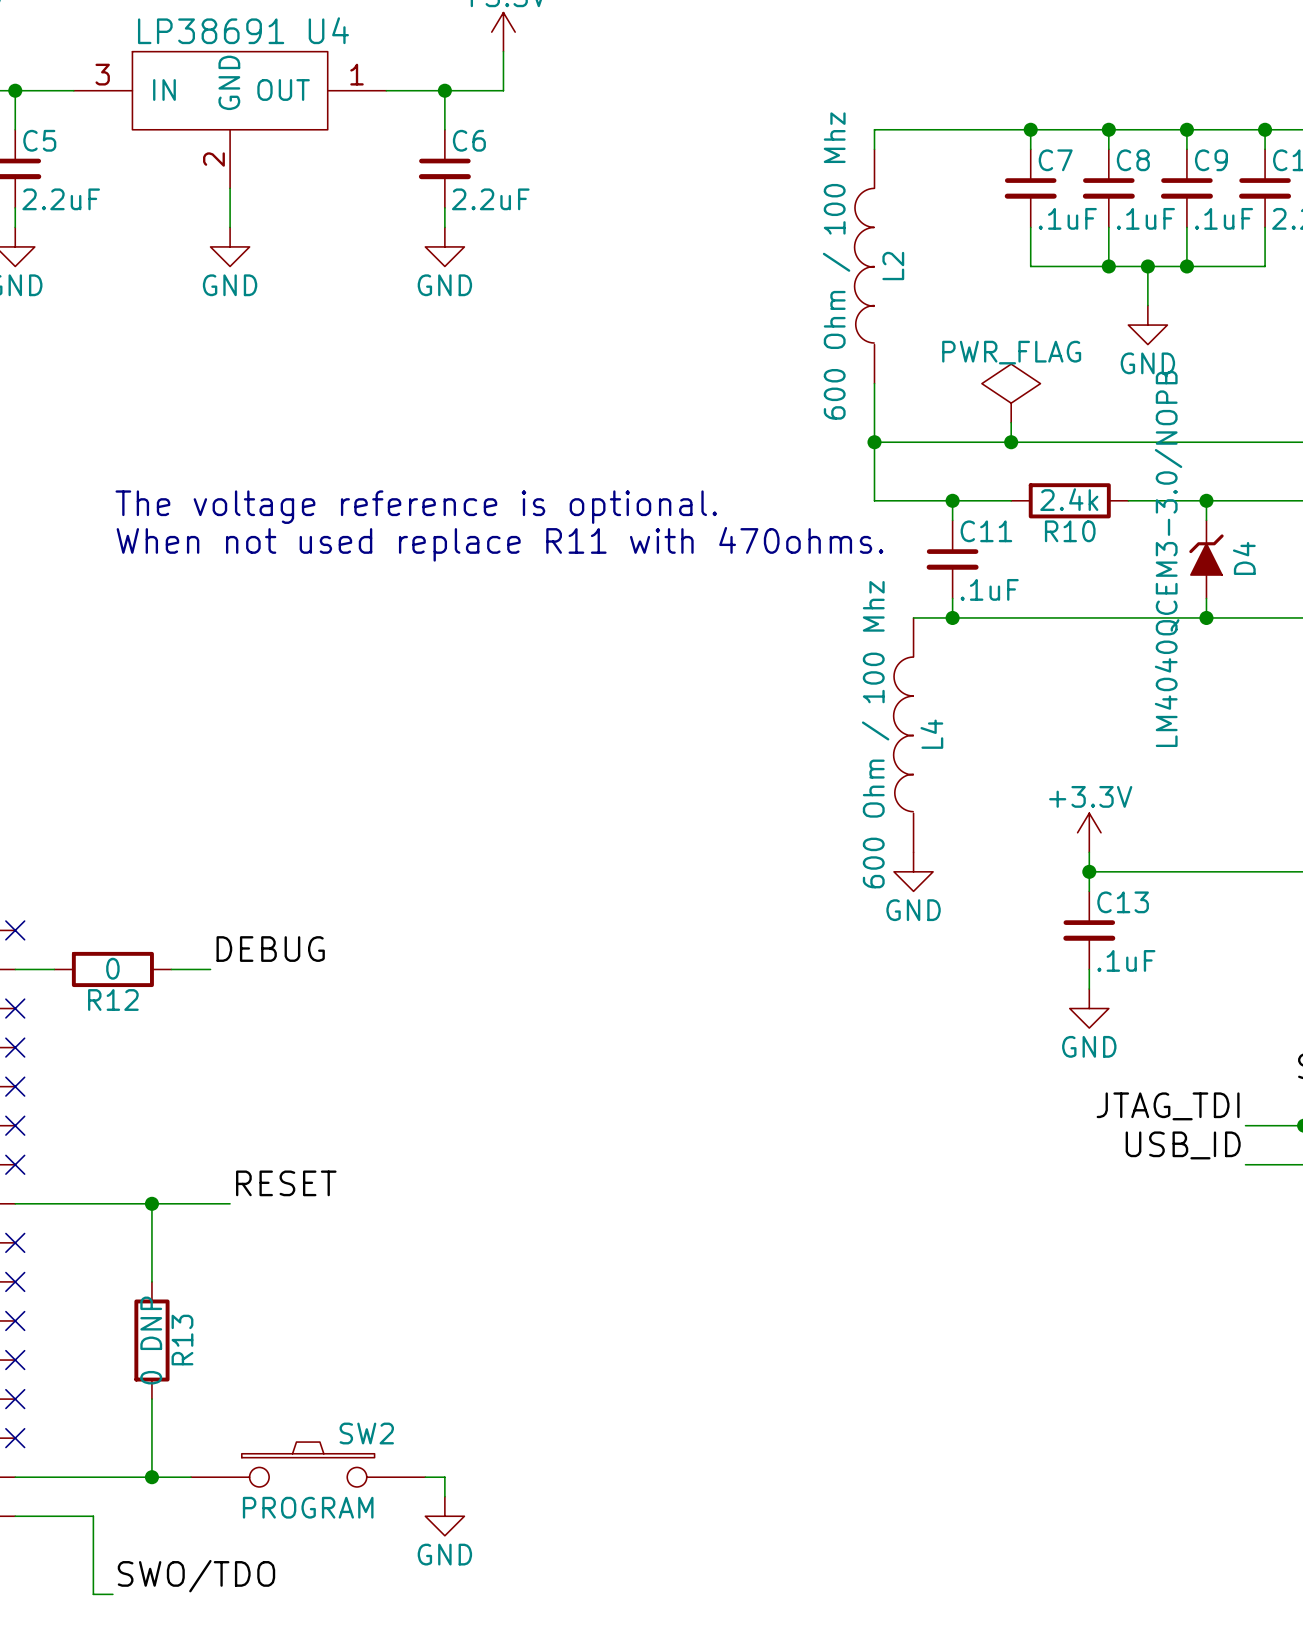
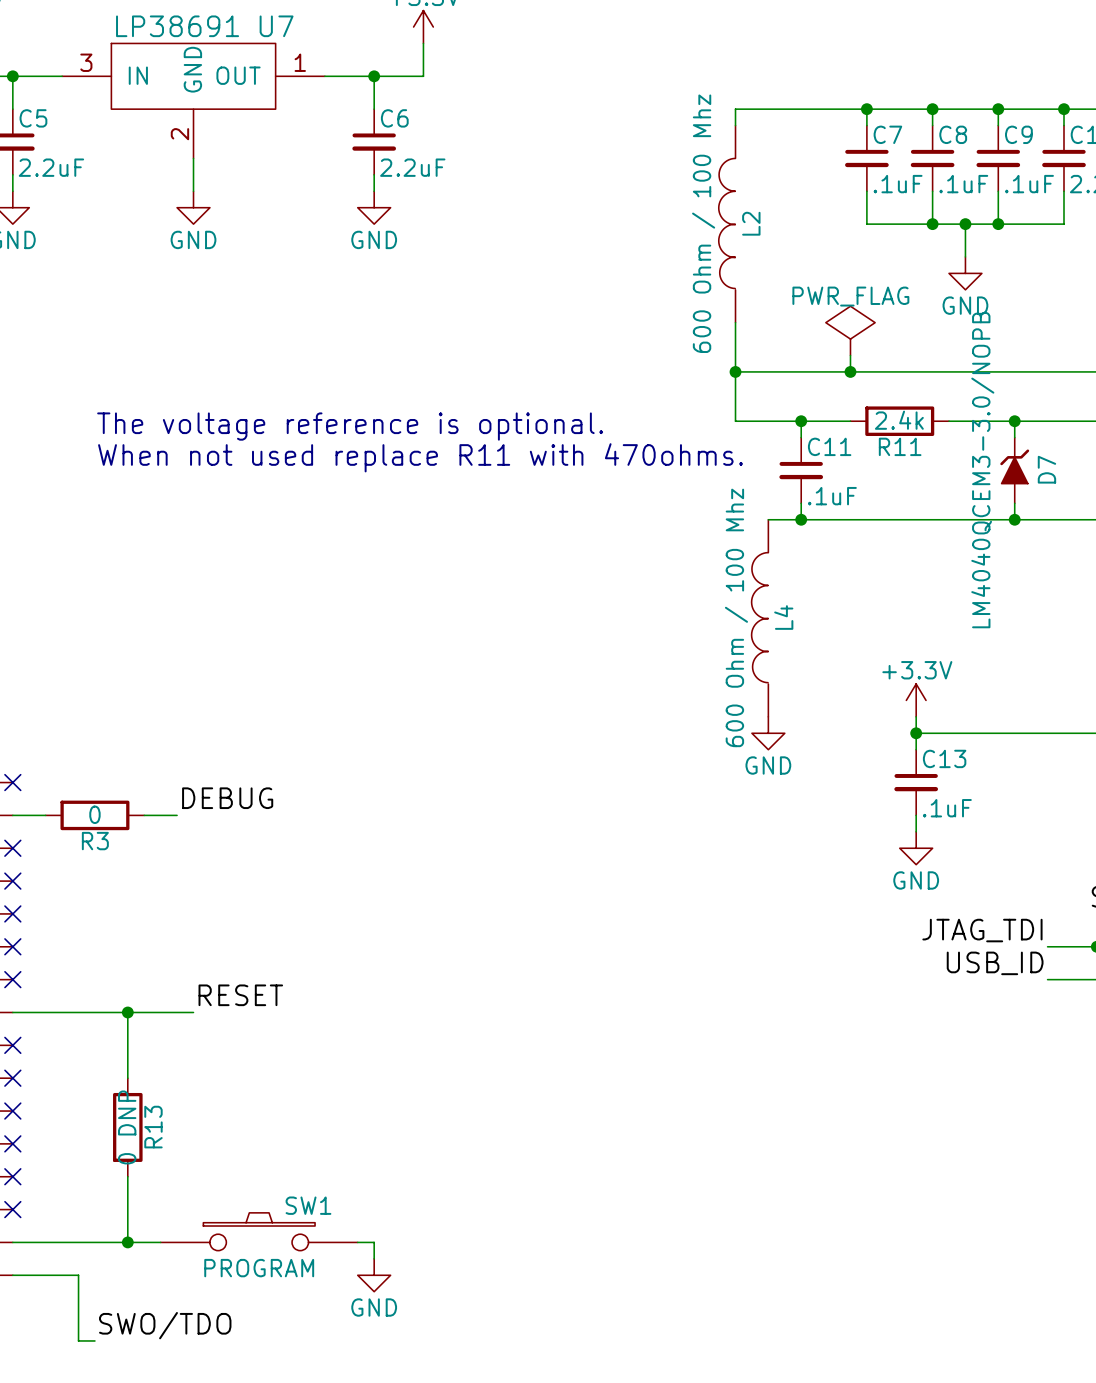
U4 name: U4 (328, 30) -> U7 (276, 26)
R10 name: R10 (1070, 531) -> R11 (900, 446)
D4 name: D4 (1244, 558) -> D7 (1046, 469)
R12 name: R12 (113, 999) -> R3 (95, 841)
SW2 name: SW2 (366, 1433) -> SW1 (308, 1205)

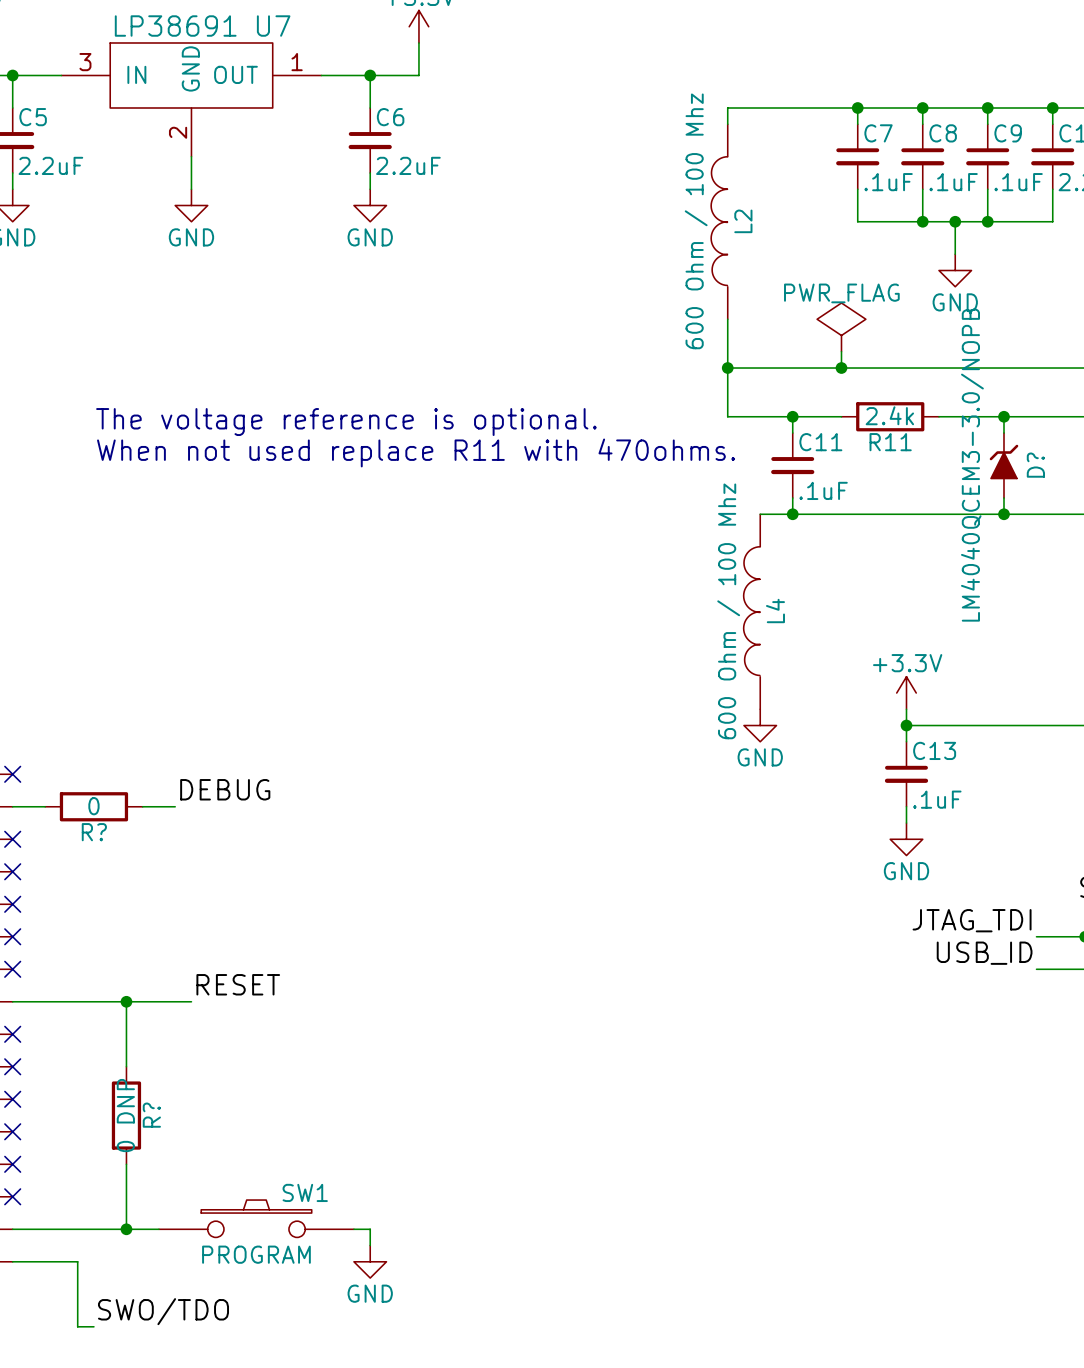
D7 name: D7 (1046, 469) -> D? (1035, 465)
R3 name: R3 (95, 841) -> R? (94, 832)
R13 name: R13 (153, 1127) -> R? (151, 1115)

